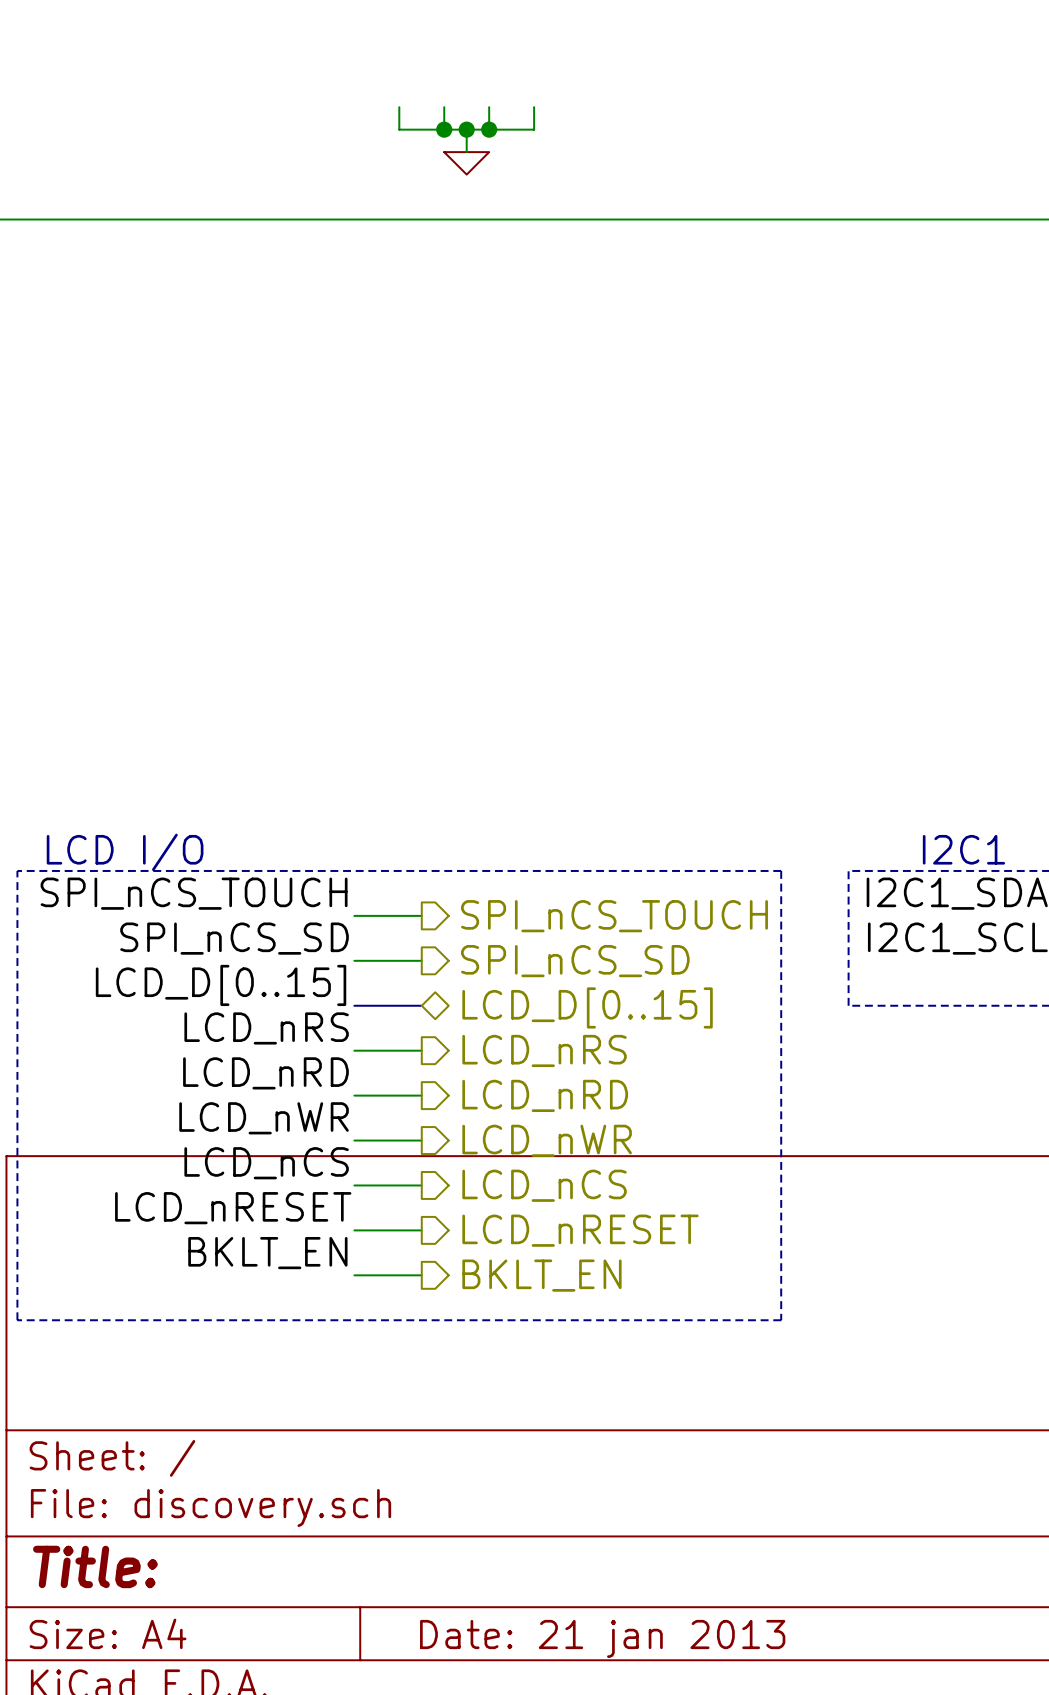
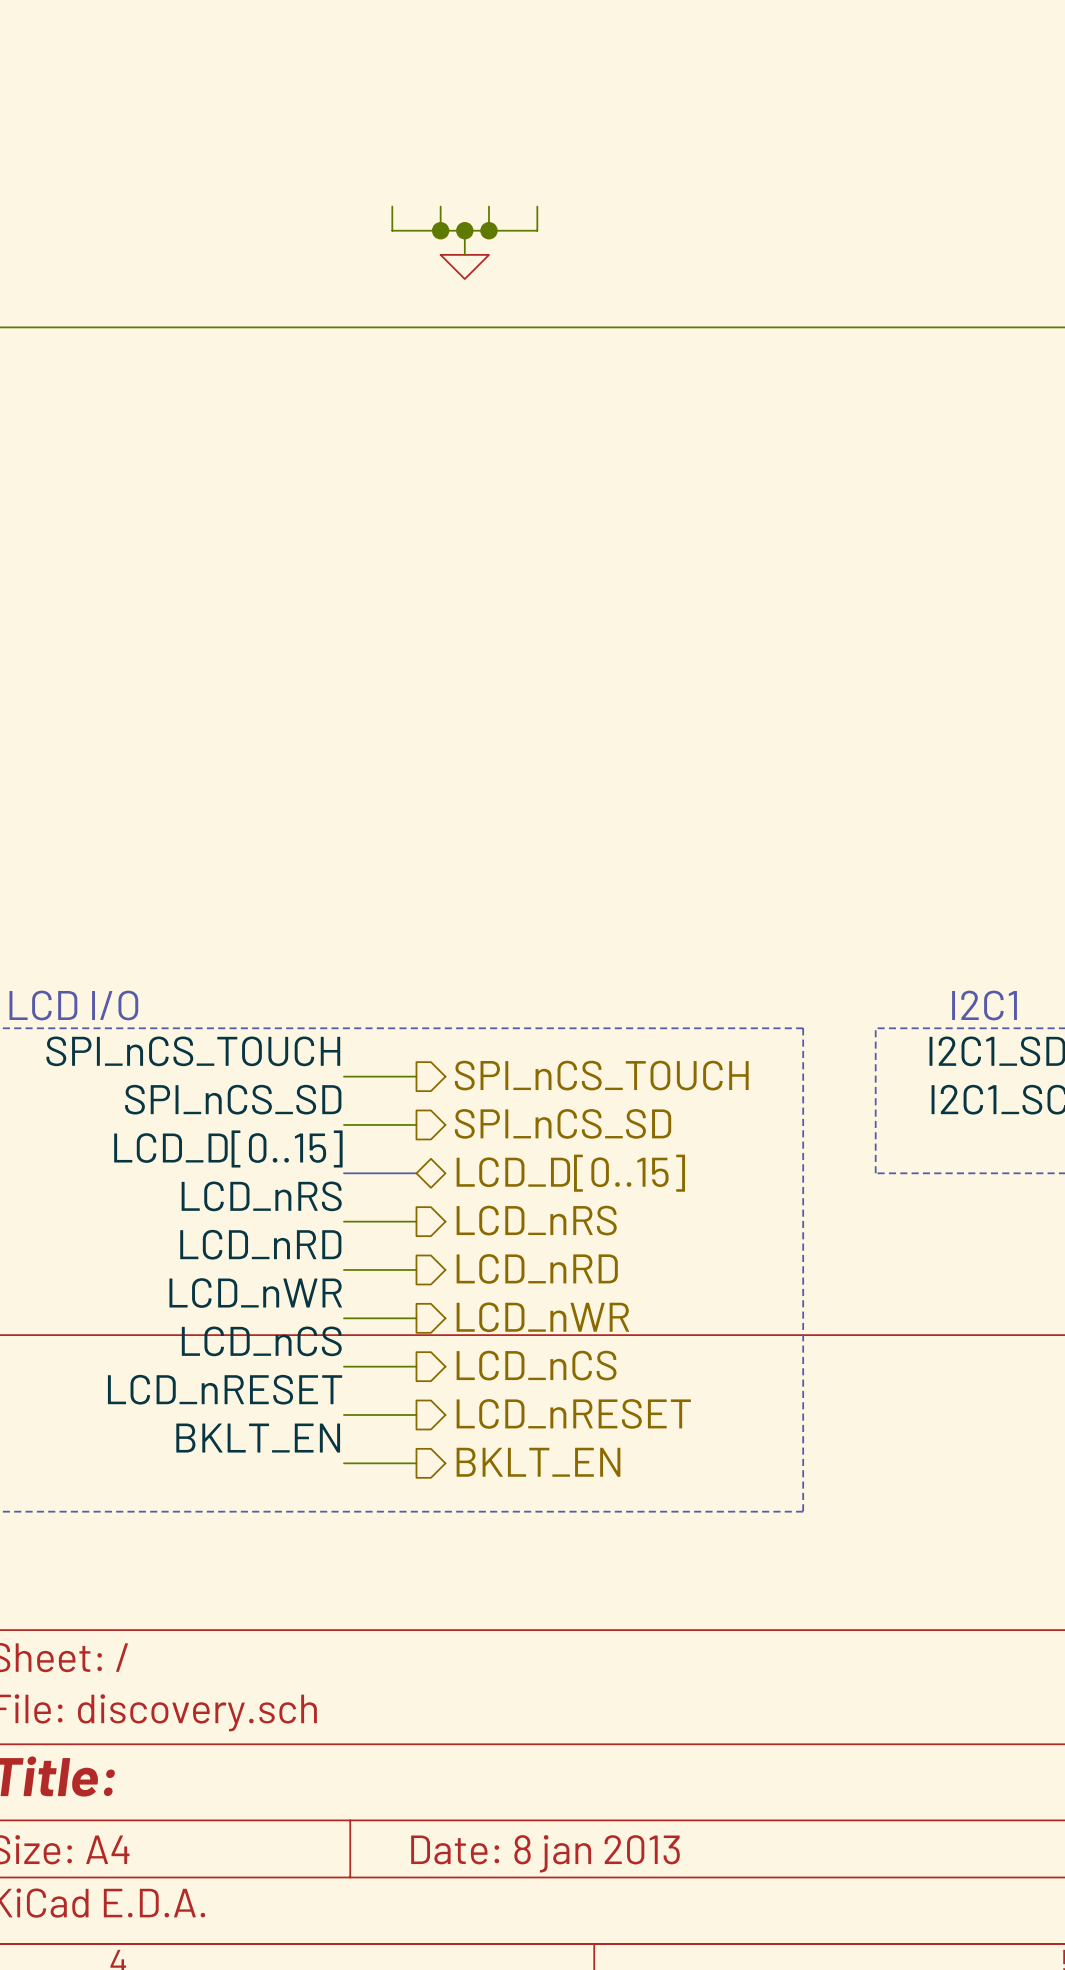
title block: Date: 21 jan 2013 (602, 1638) -> Date: 8 jan 2013 (545, 1853)

